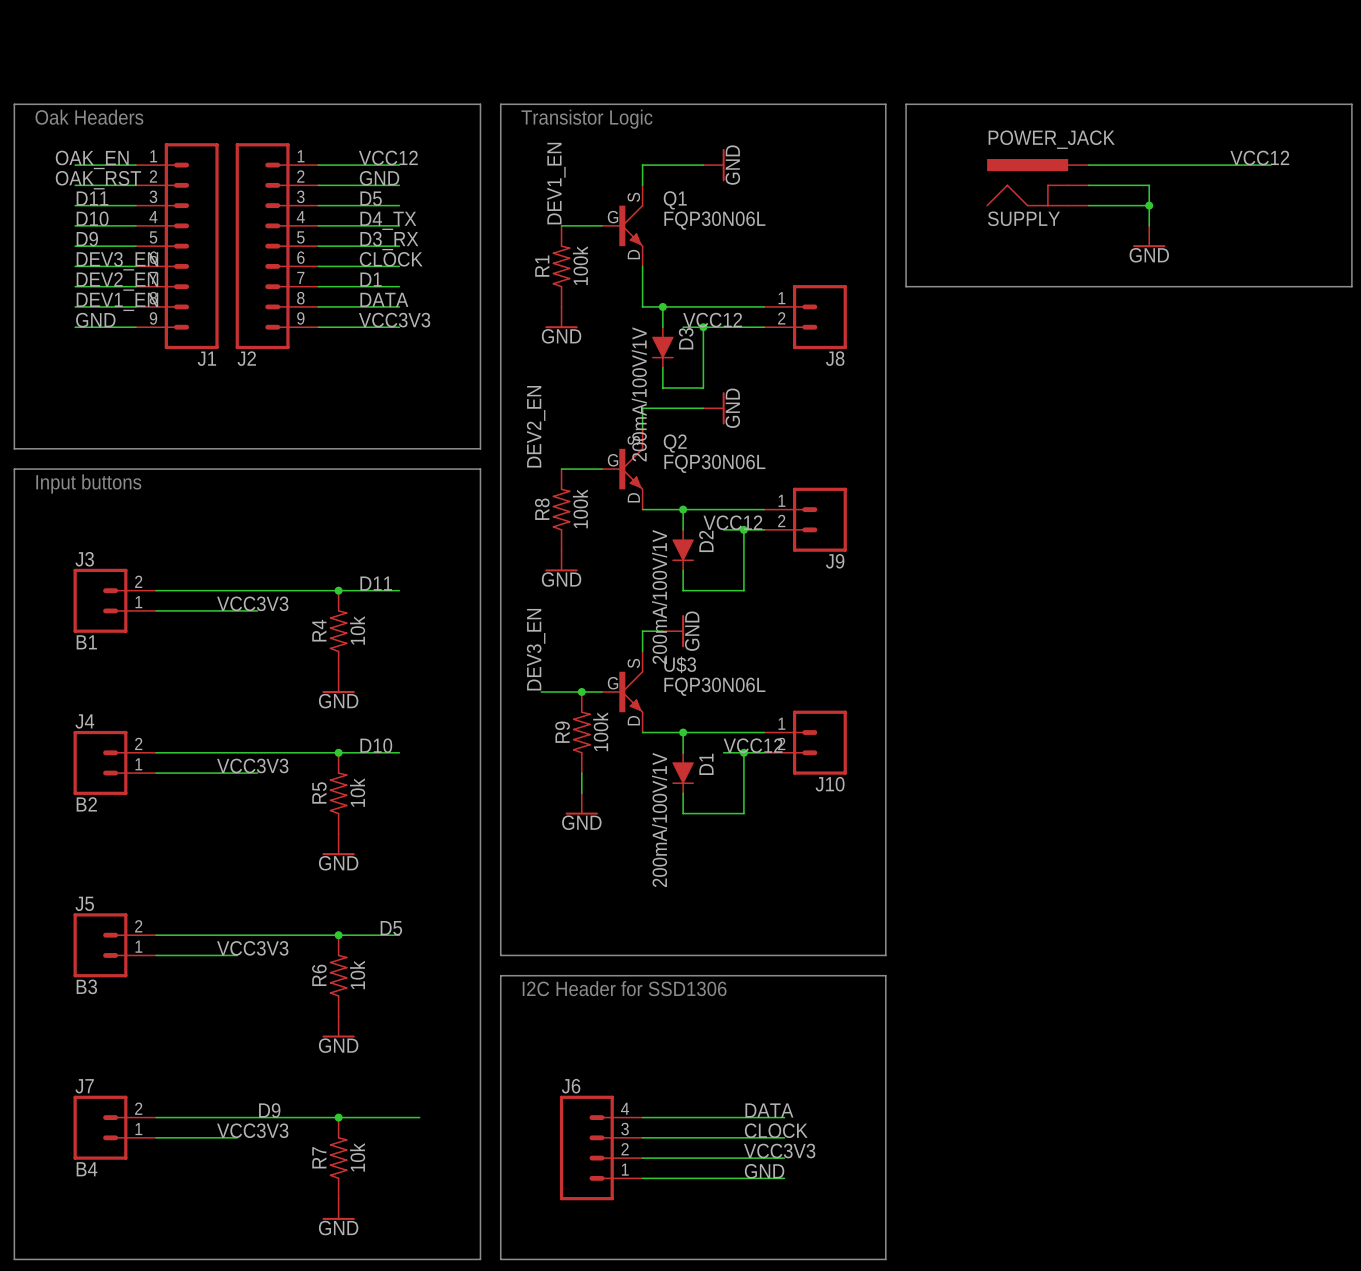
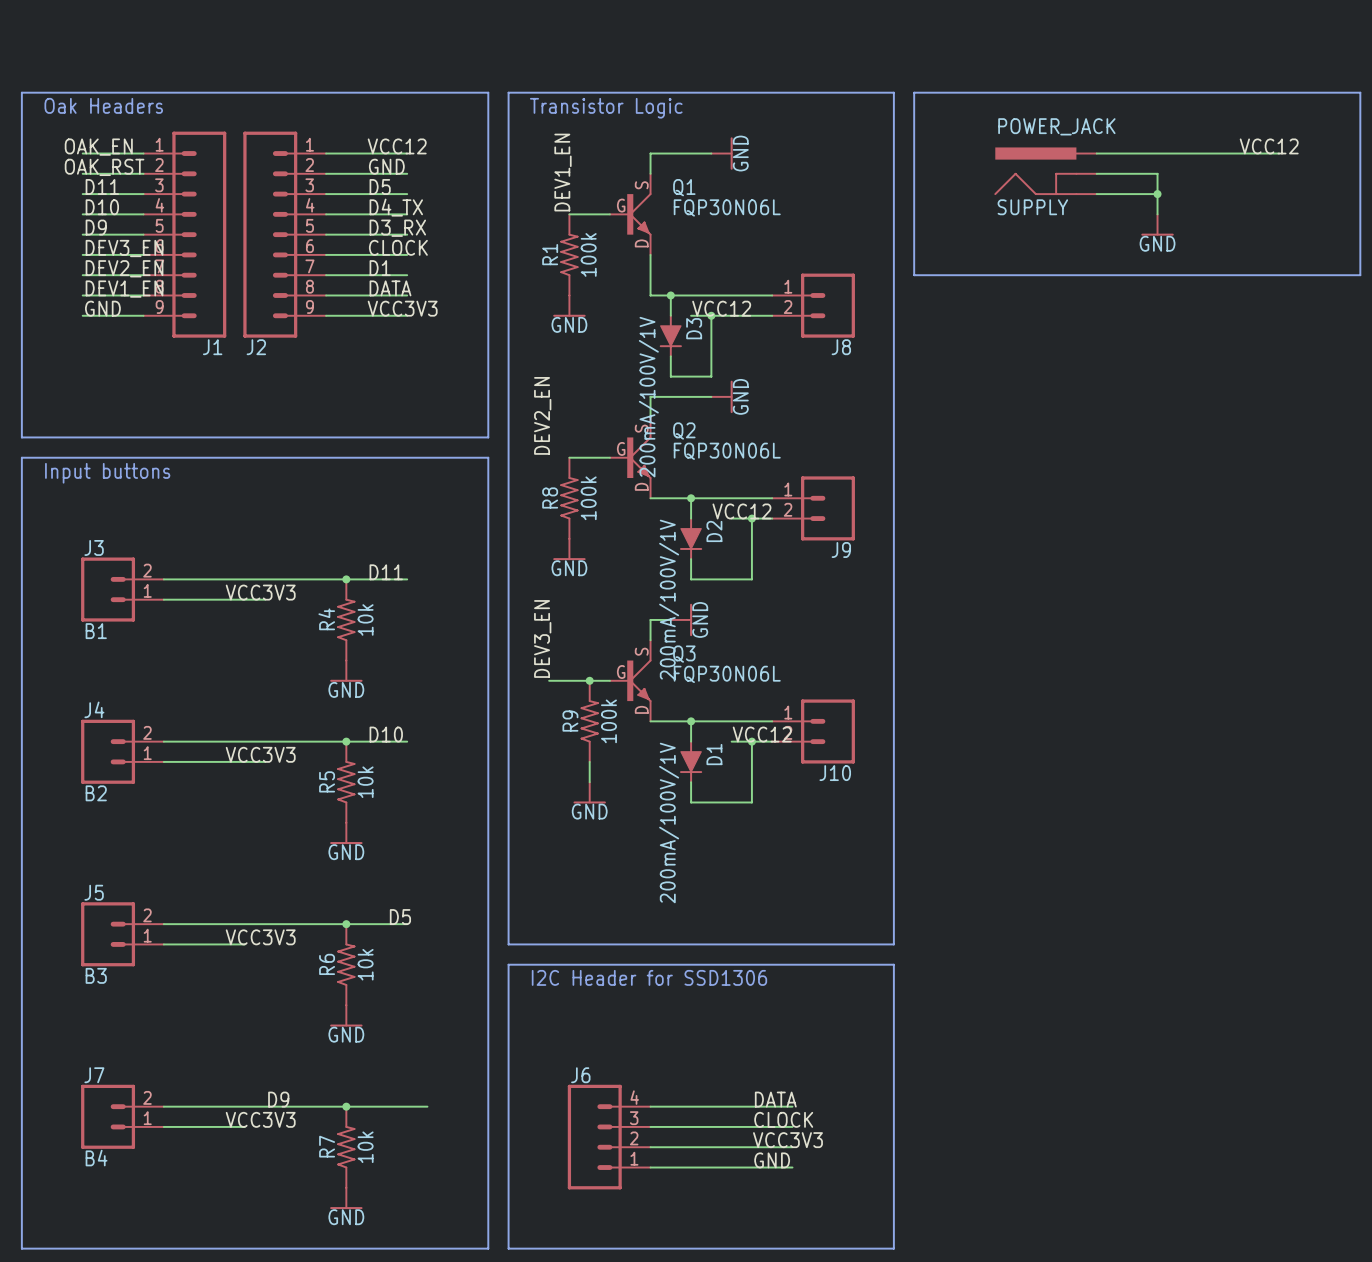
U$3 name: U$3 (680, 664) -> Q3 (684, 654)

